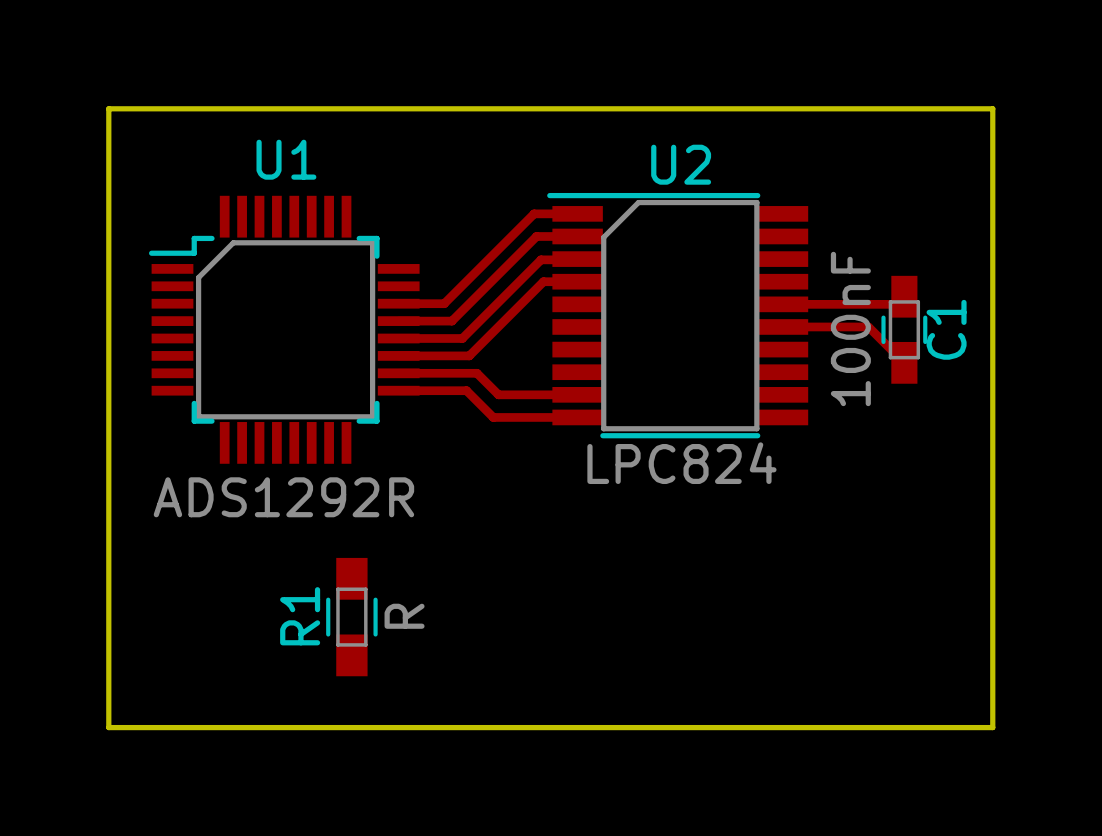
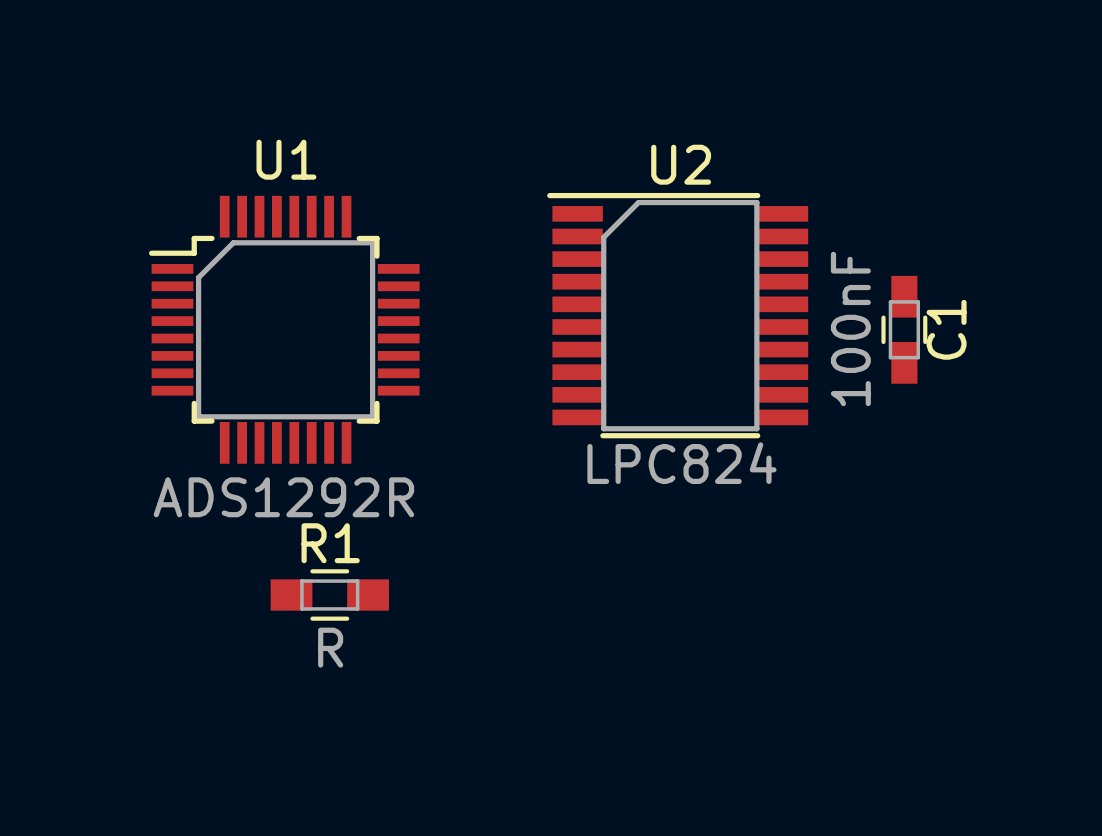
board edge: (108, 108) (108, 727) (992, 727) (992, 108) (108, 108) -> none
track: (577, 213) (534, 213) (444, 303) (398, 303) -> none
track: (577, 236) (536, 236) (451, 321) (398, 321) -> none
track: (577, 259) (541, 259) (462, 338) (398, 338) -> none
track: (577, 281) (543, 281) (469, 355) (398, 355) -> none
track: (904, 296) (896, 304) (782, 304) -> none
track: (782, 326) (868, 326) (904, 362) -> none
track: (398, 373) (477, 373) (498, 394) (577, 394) -> none
track: (398, 390) (466, 390) (493, 417) (577, 417) -> none
R1 rotation: 0° (351, 617) -> 90° clockwise (329, 594)

